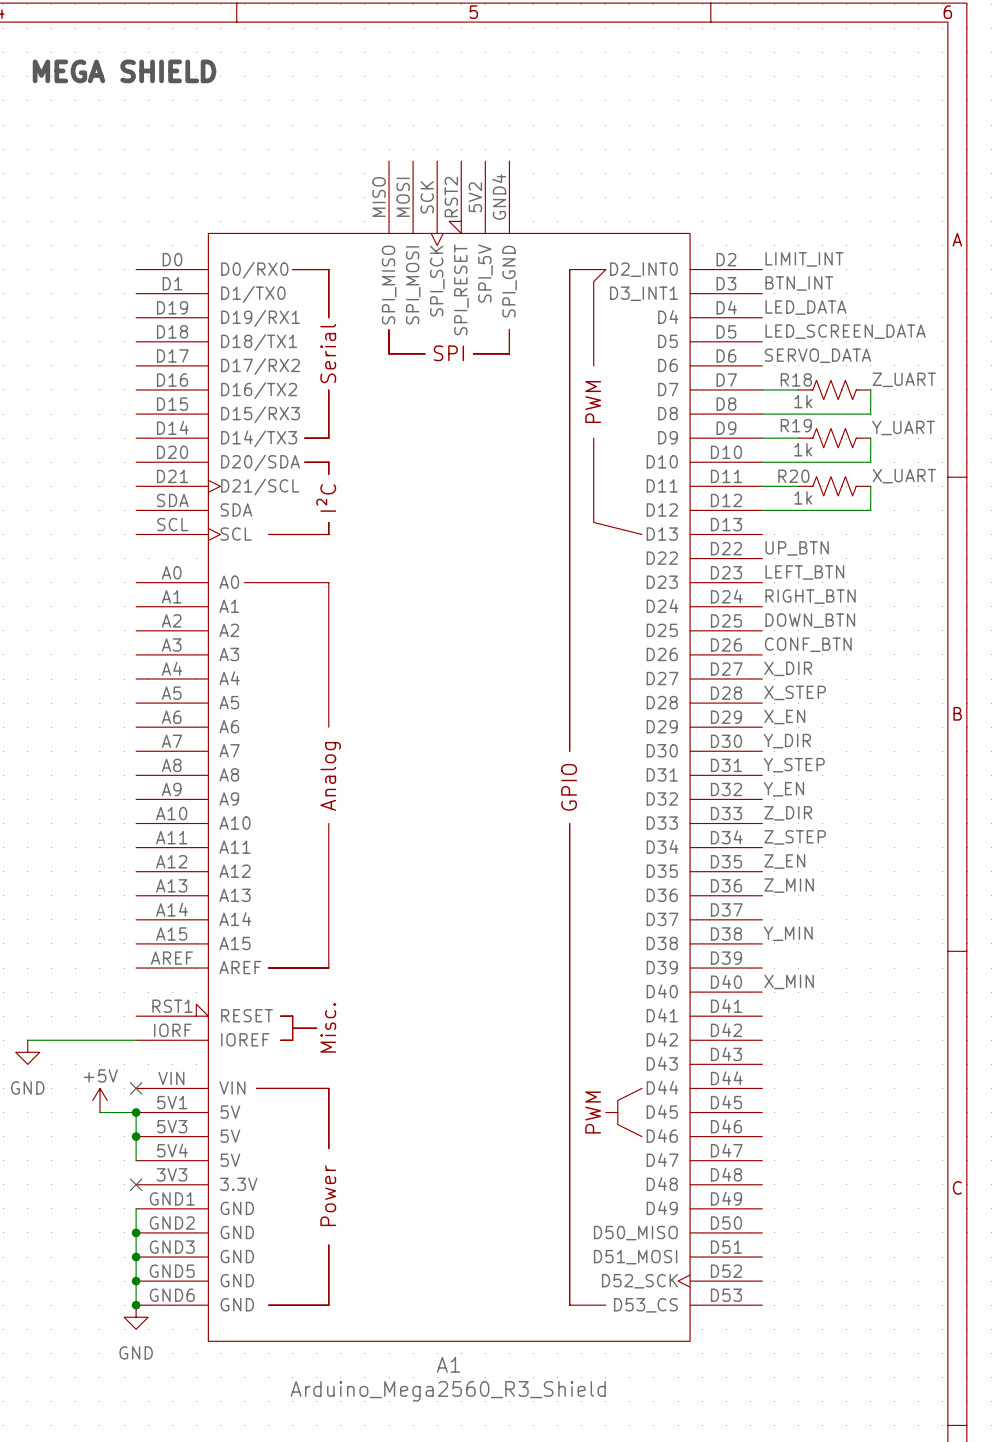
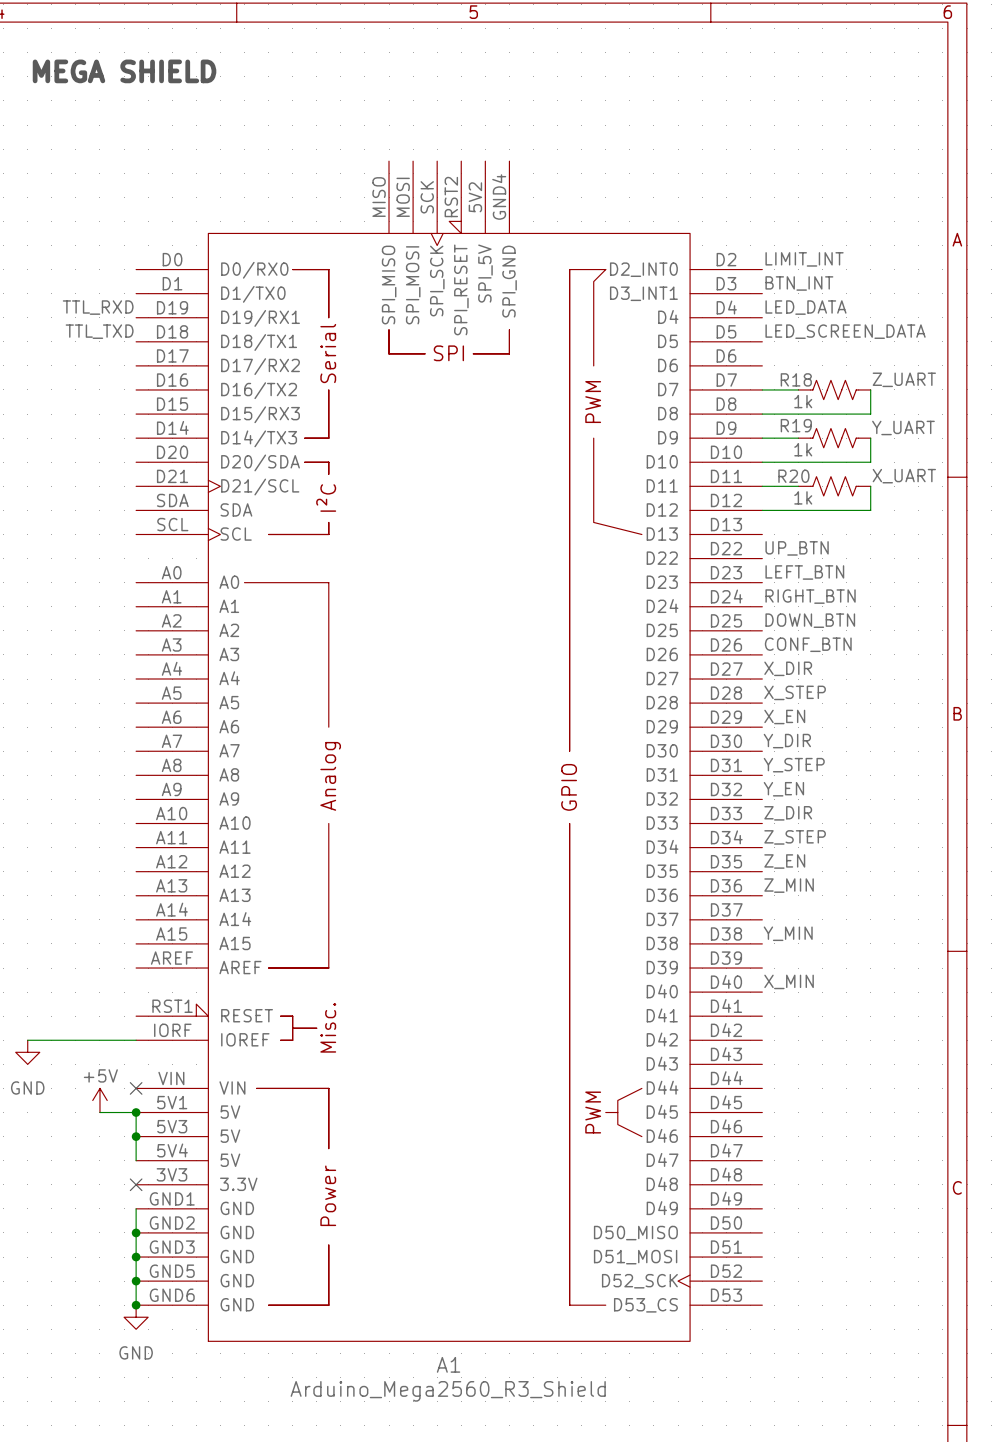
label: none -> TTL_RXD (98, 307)
label: none -> TTL_TXD (99, 331)
label: SERVO_DATA (818, 355) -> none

